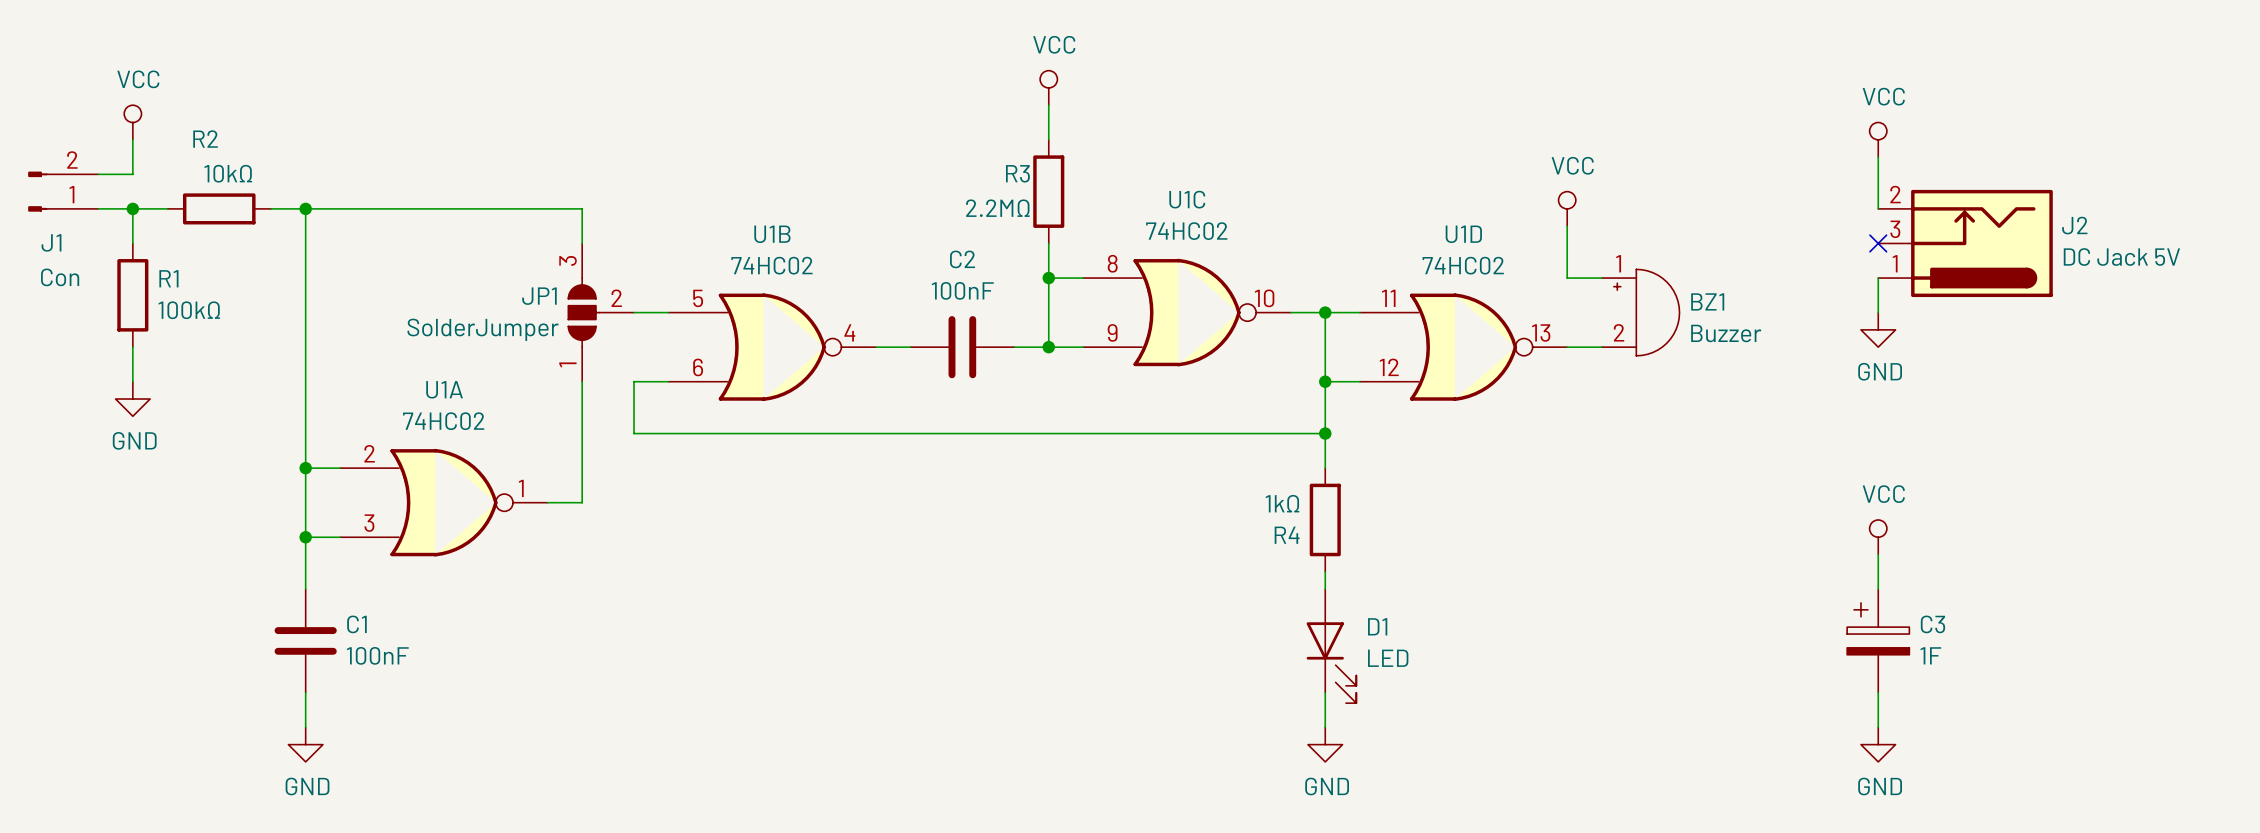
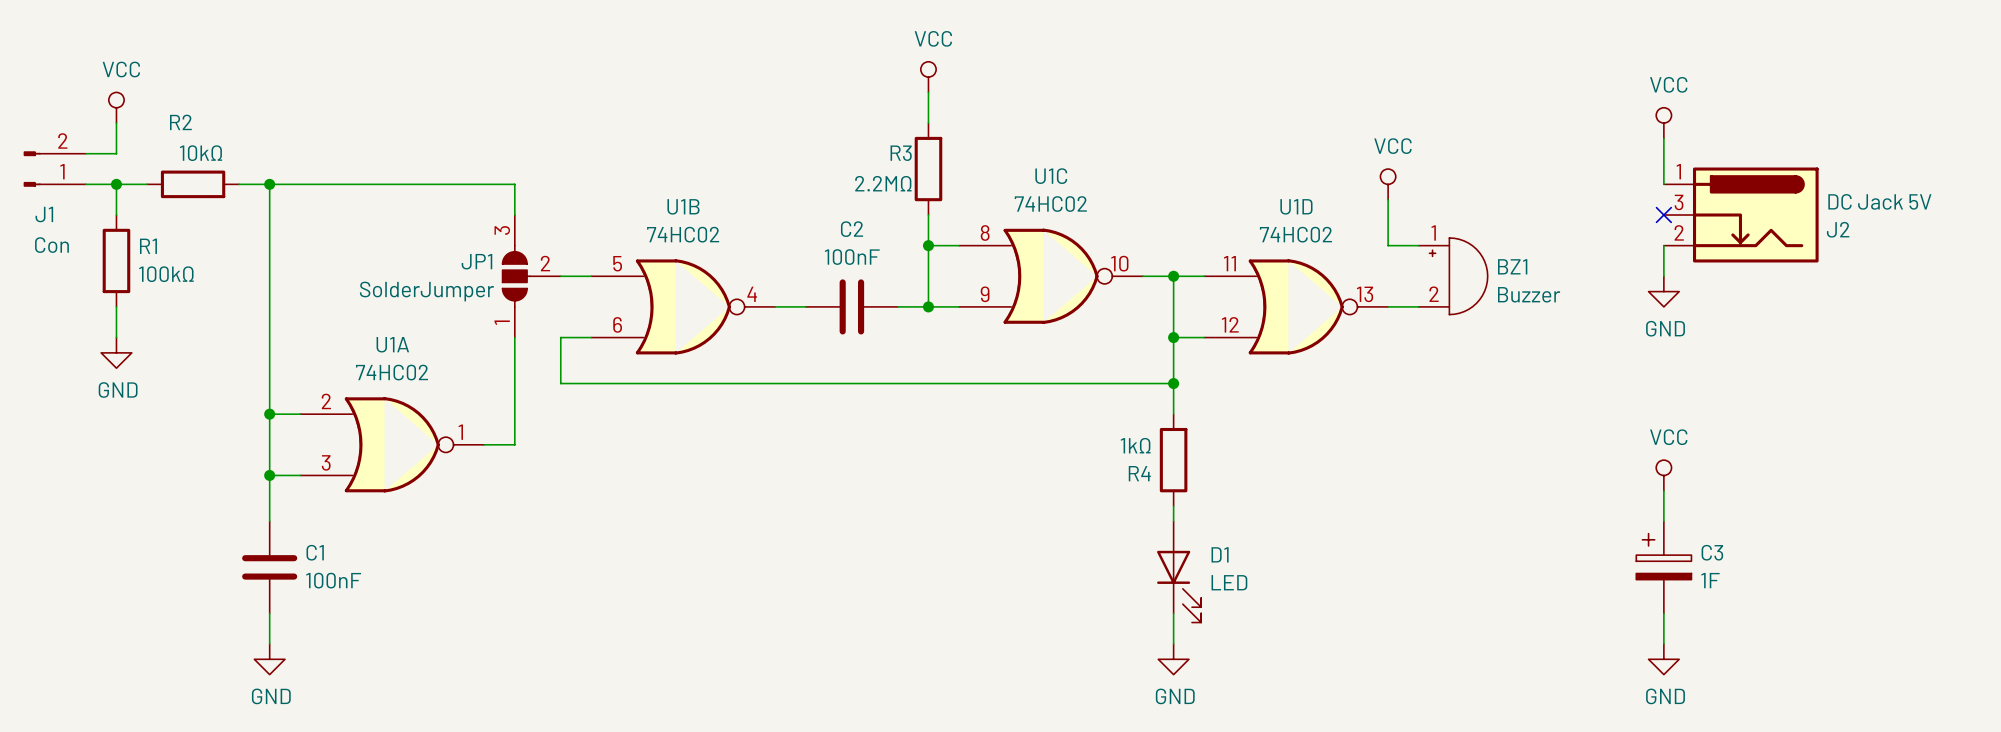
J2 flip: as is (1981, 243) -> up-down (1755, 215)

